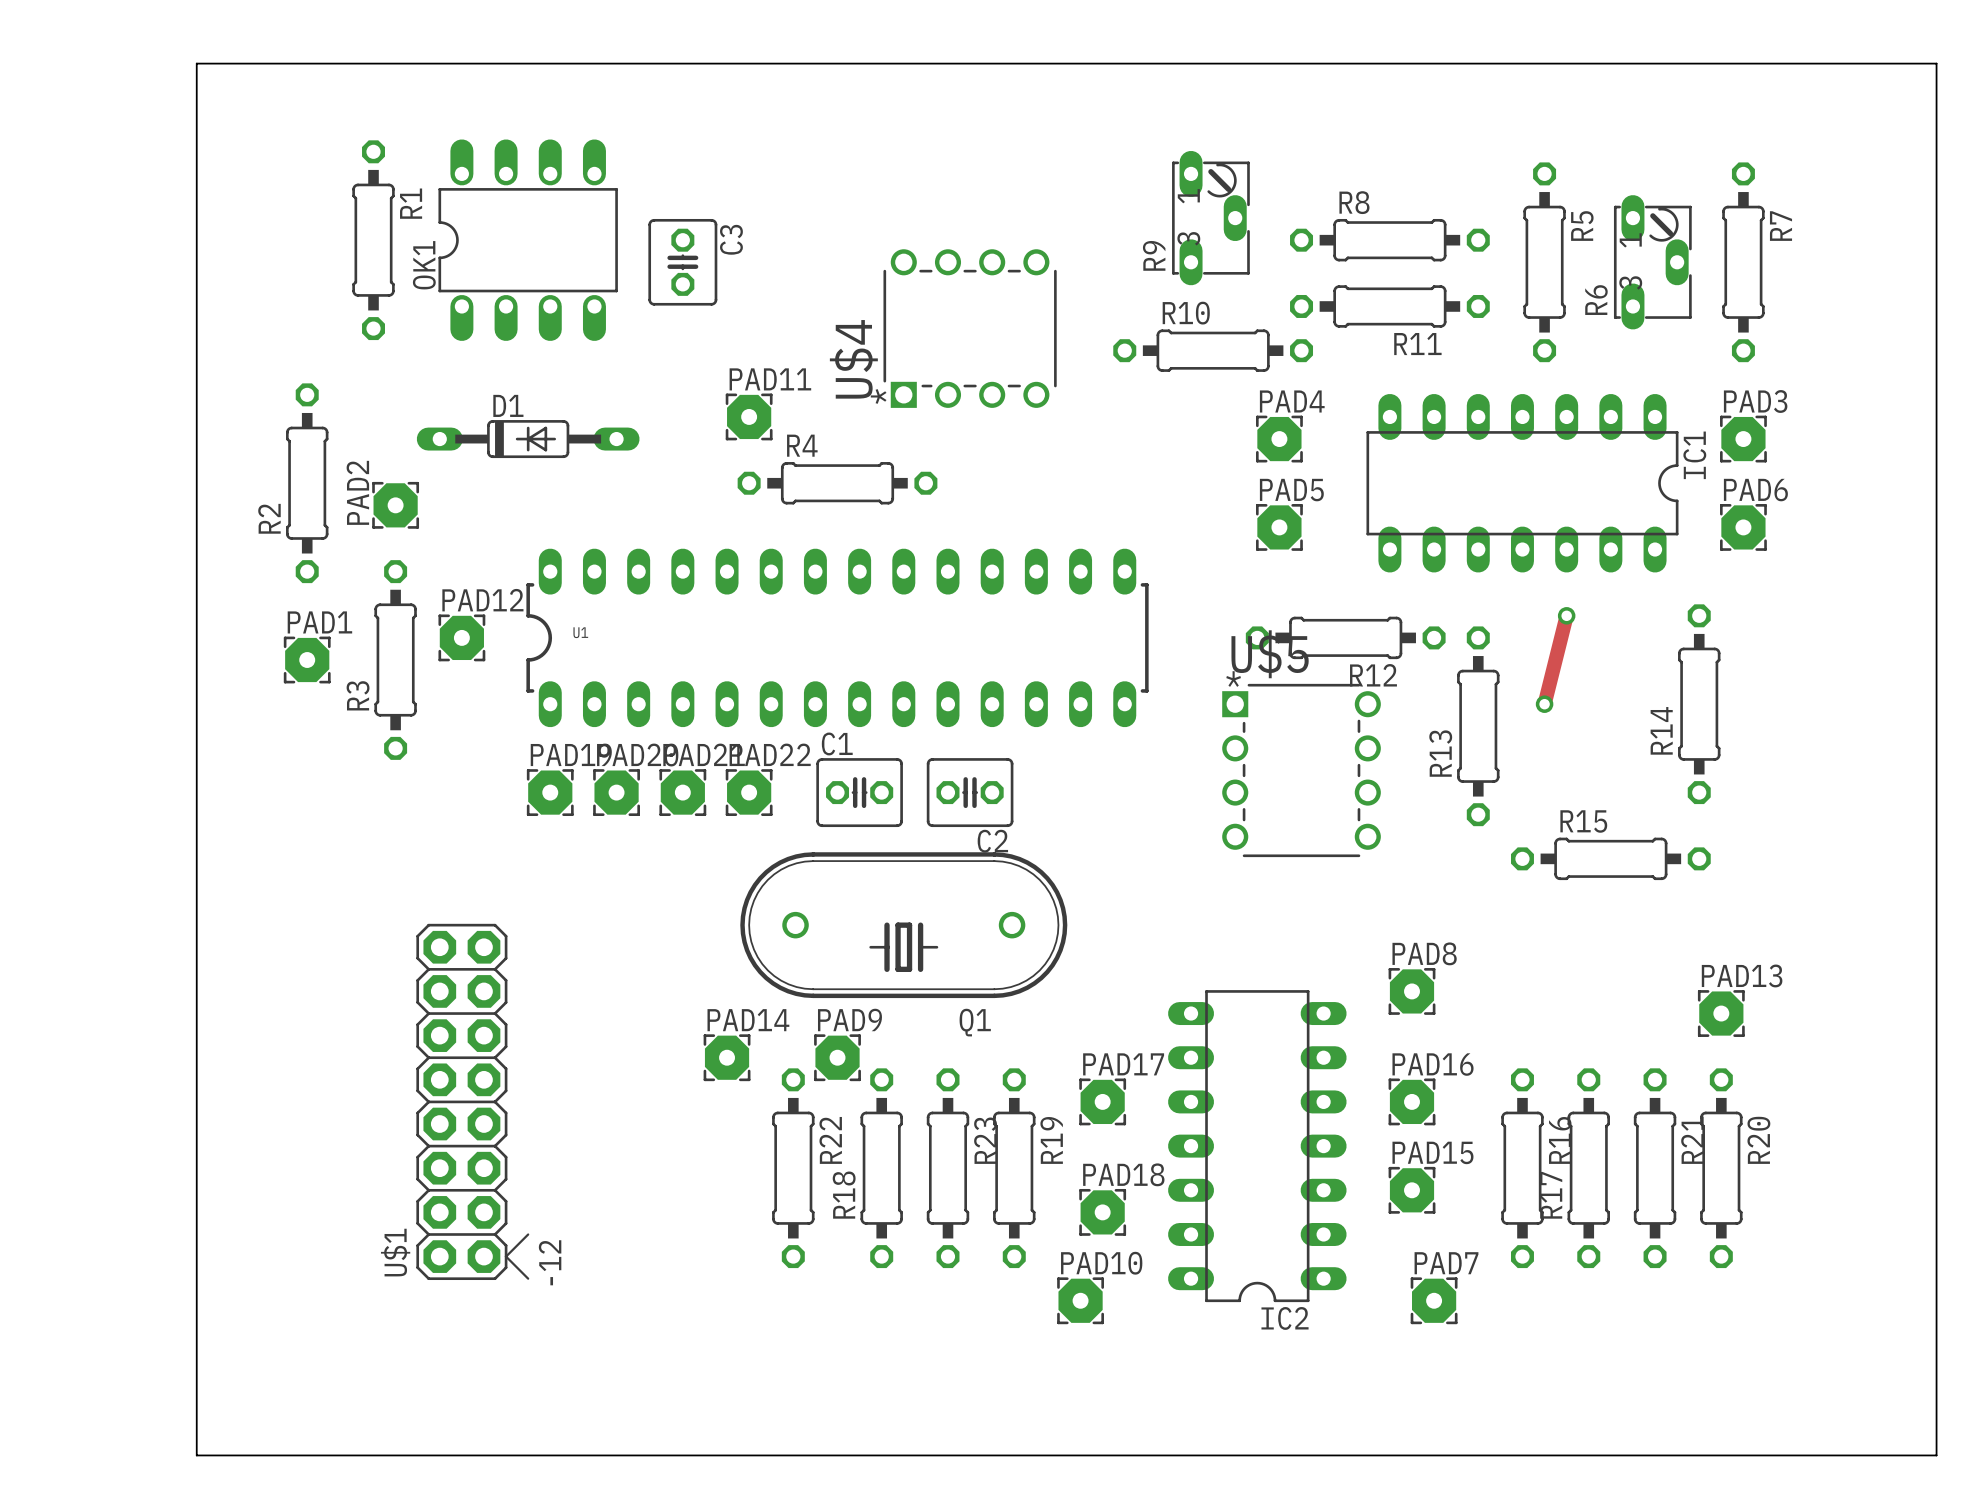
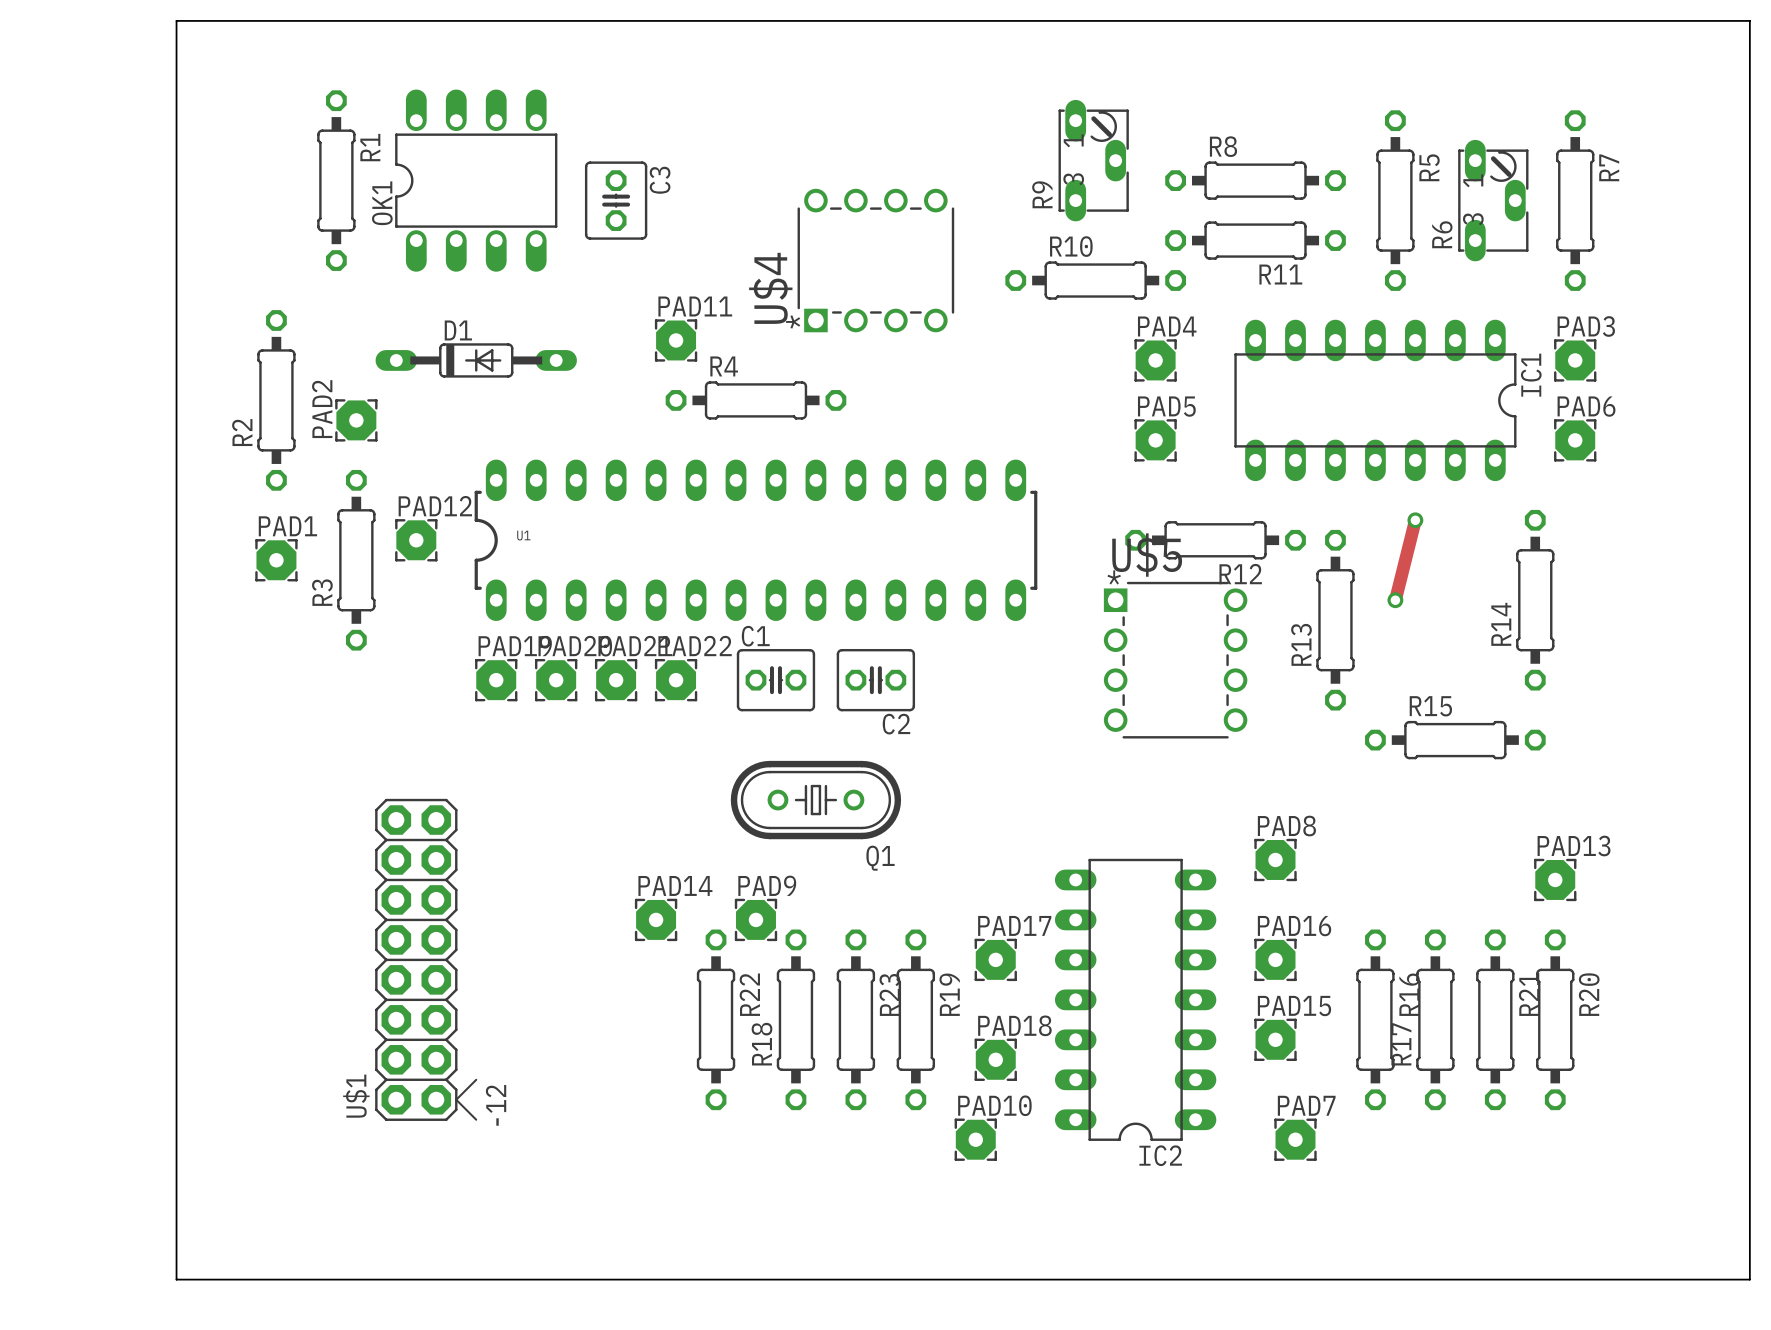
Q1 footprint: [740, 852, 1068, 999] -> [730, 760, 902, 840]

